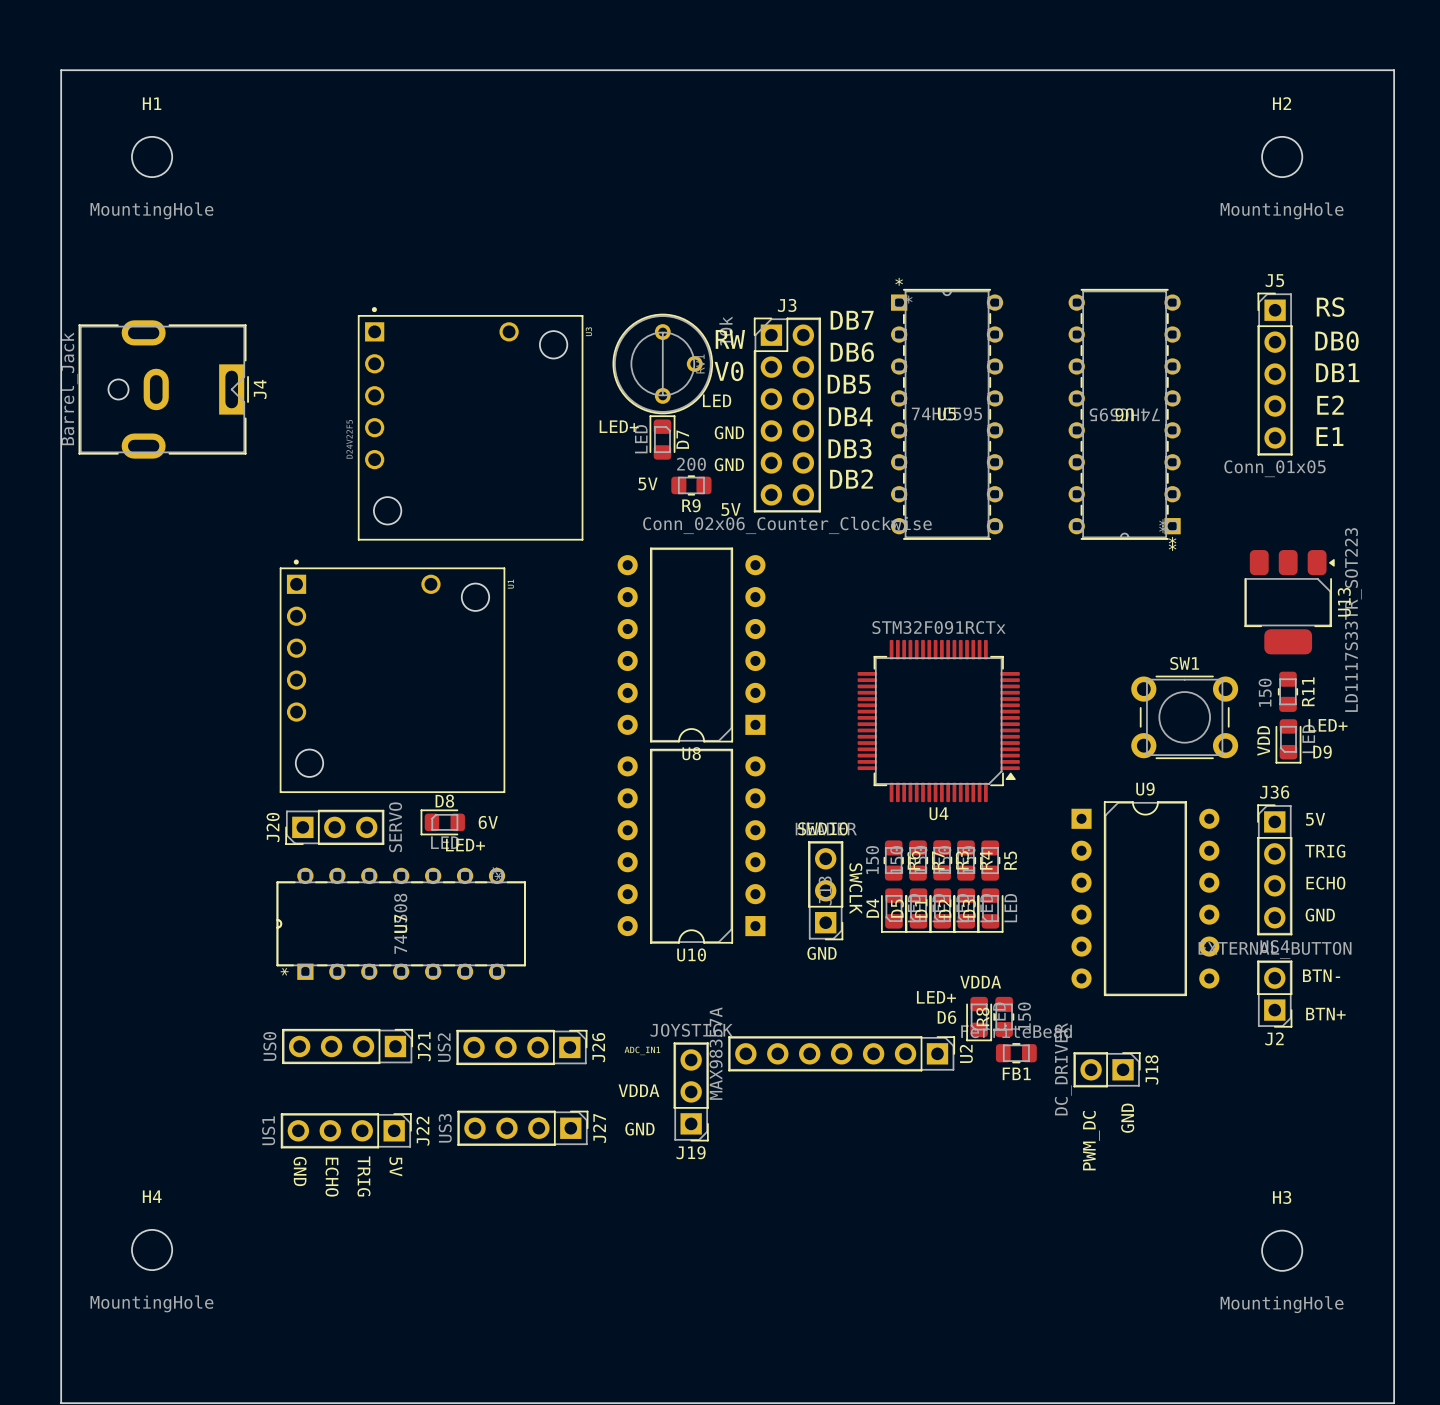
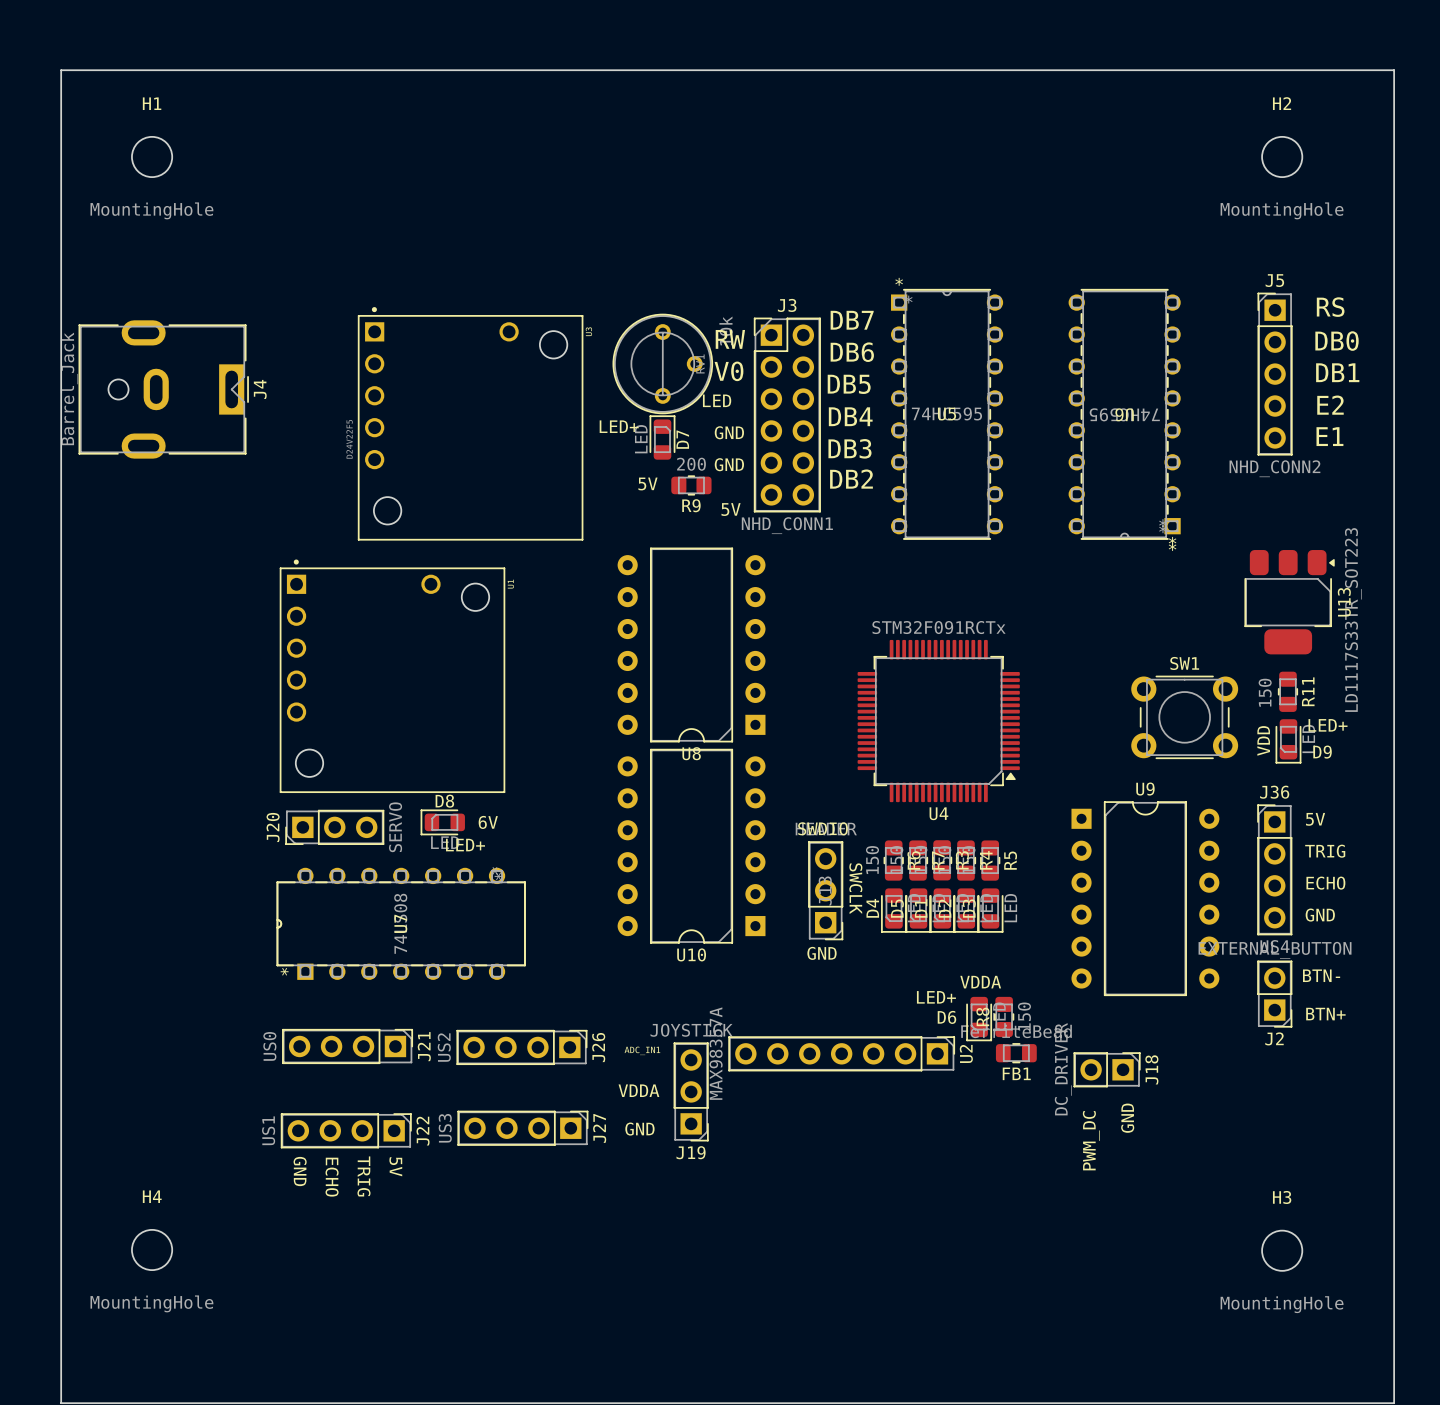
J5 value: Conn_01x05 (1274, 468) -> NHD_CONN2 (1274, 468)
J3 value: Conn_02x06_Counter_Clockwise (787, 525) -> NHD_CONN1 (787, 525)

